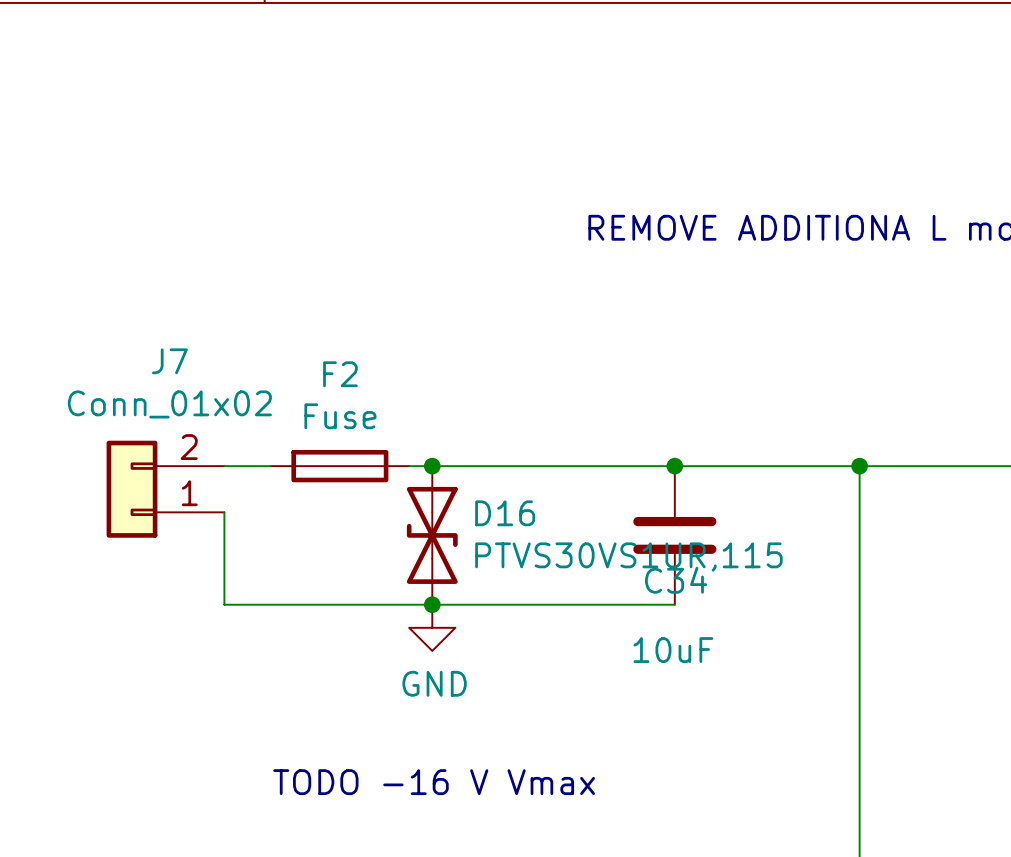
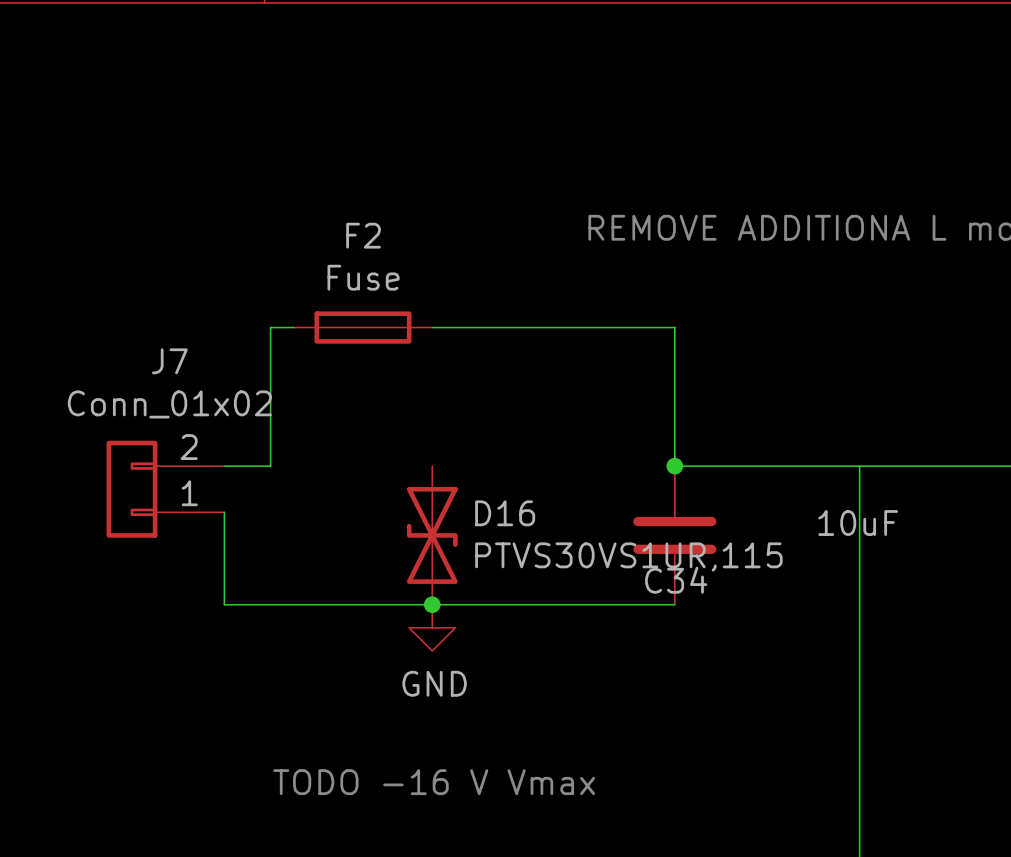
wire: none -> (293, 327) (270, 327) (270, 466)
F2 position: (339, 466) -> (362, 327)
wire: (409, 466) (674, 466) -> (432, 327) (674, 327) (674, 466)
junction: (432, 466) -> none
junction: (859, 466) -> none
C34 value position: 10uF (673, 650) -> 10uF (858, 523)

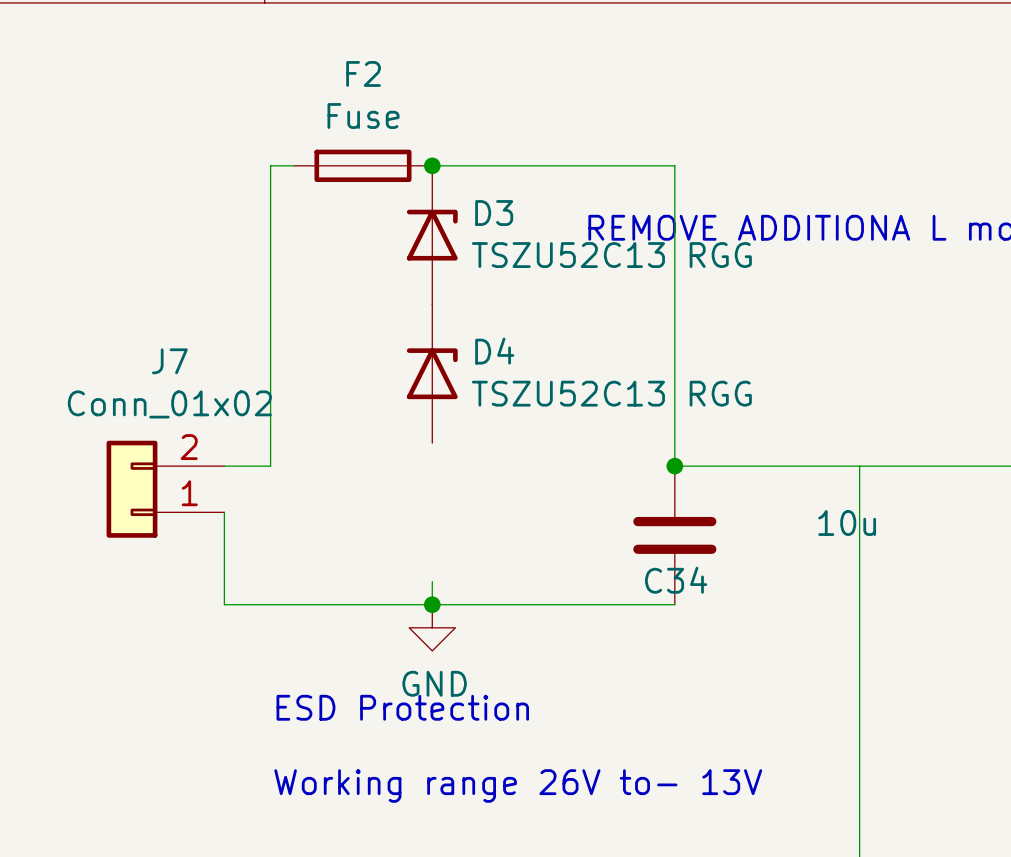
junction: none -> (432, 165)
D3: none -> TSZU52C13 RGG (432, 235)
wire: (270, 327) (293, 327) -> (270, 327) (270, 165) (293, 165)
F2 position: (362, 327) -> (362, 165)
wire: (432, 327) (674, 327) -> (432, 165) (674, 165) (674, 327)
D4: none -> TSZU52C13 RGG (432, 373)
C34 value: 10uF (858, 523) -> 10u (847, 523)
D16: PTVS30VS1UR,115 (432, 535) -> none
text: none -> ESD Protection (402, 707)
text: TODO -16 V Vmax (434, 782) -> Working range 26V to- 13V (518, 785)

